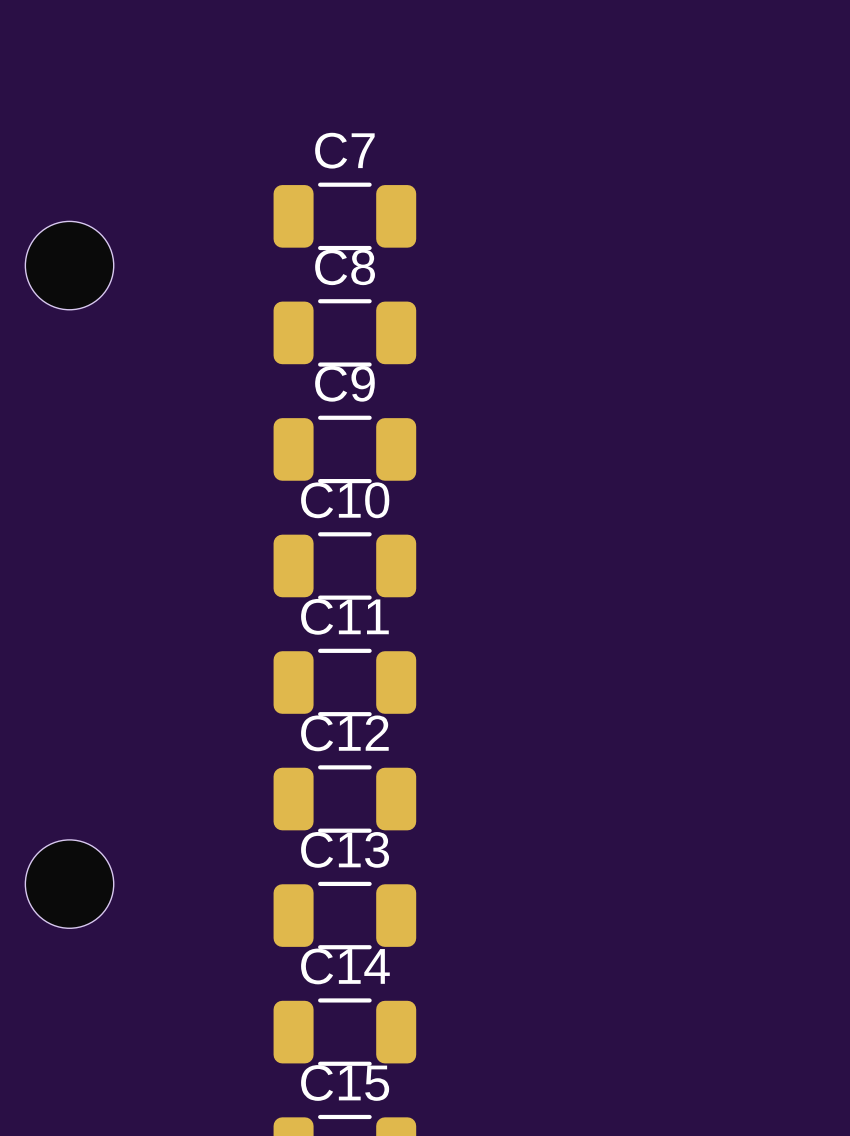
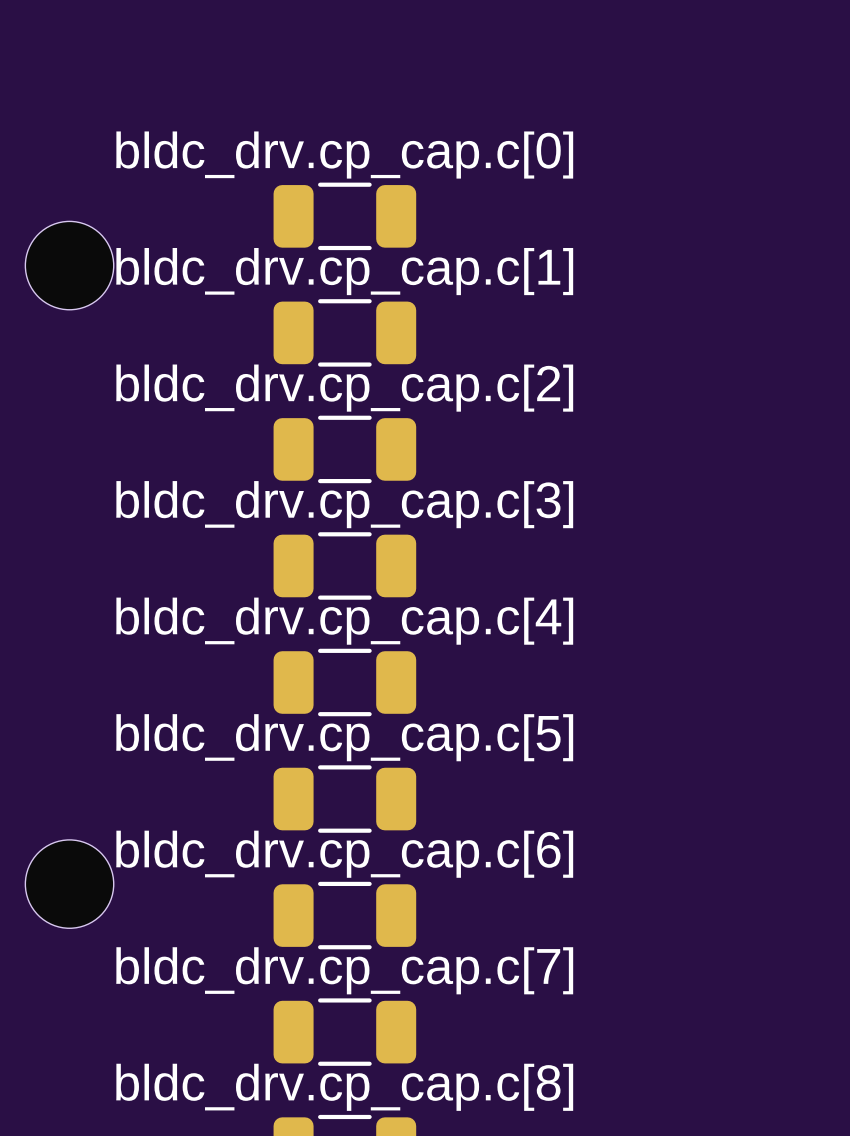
C7 name: C7 (344, 150) -> bldc_drv.cp_cap.c[0] (344, 155)
C8 name: C8 (345, 267) -> bldc_drv.cp_cap.c[1] (344, 271)
C9 name: C9 (344, 383) -> bldc_drv.cp_cap.c[2] (344, 388)
C10 name: C10 (345, 500) -> bldc_drv.cp_cap.c[3] (344, 504)
C11 name: C11 (344, 616) -> bldc_drv.cp_cap.c[4] (344, 621)
C12 name: C12 (344, 733) -> bldc_drv.cp_cap.c[5] (344, 737)
C13 name: C13 (345, 849) -> bldc_drv.cp_cap.c[6] (344, 854)
C14 name: C14 (345, 966) -> bldc_drv.cp_cap.c[7] (344, 970)
C15 name: C15 (345, 1082) -> bldc_drv.cp_cap.c[8] (344, 1087)

